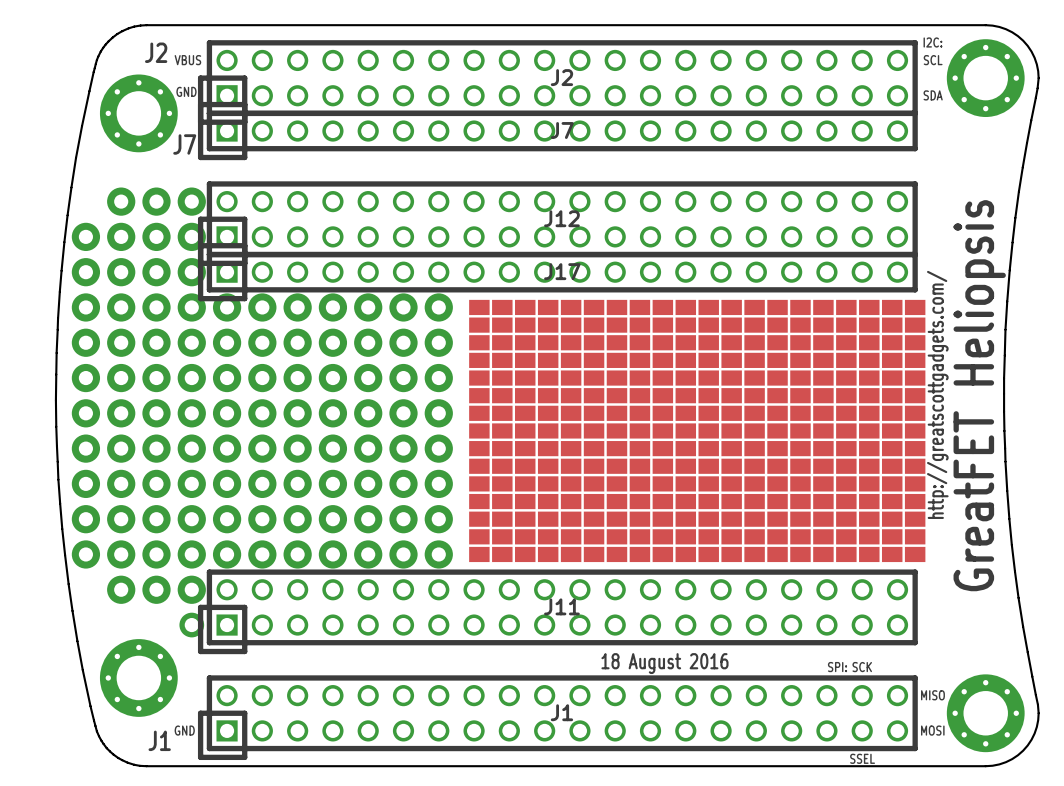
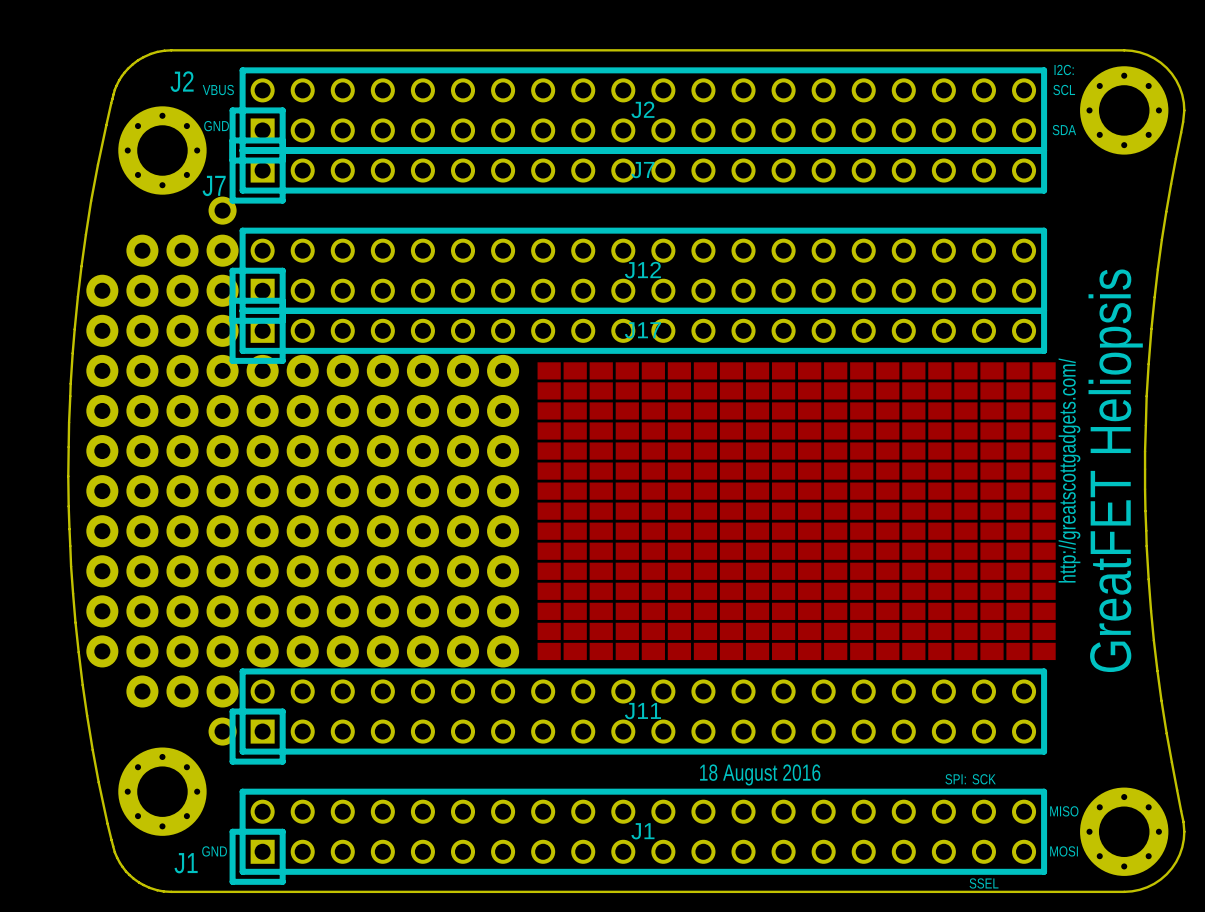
part: none -> (302, 471)

